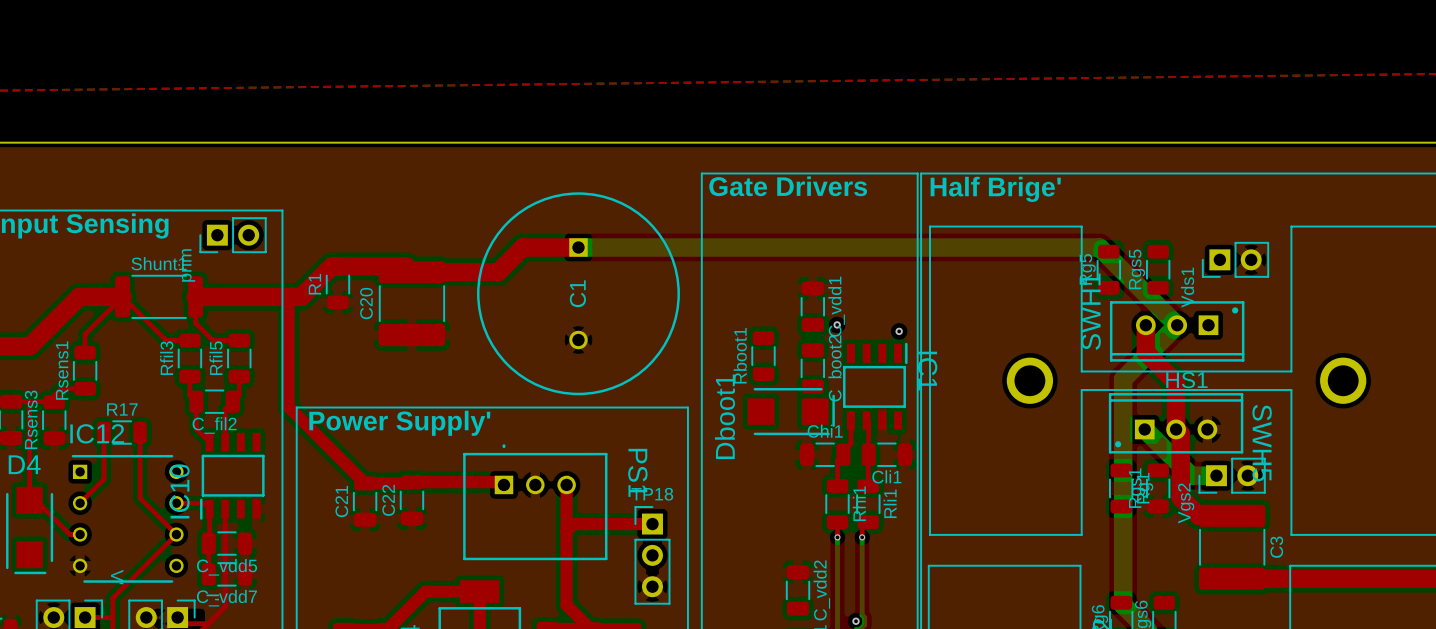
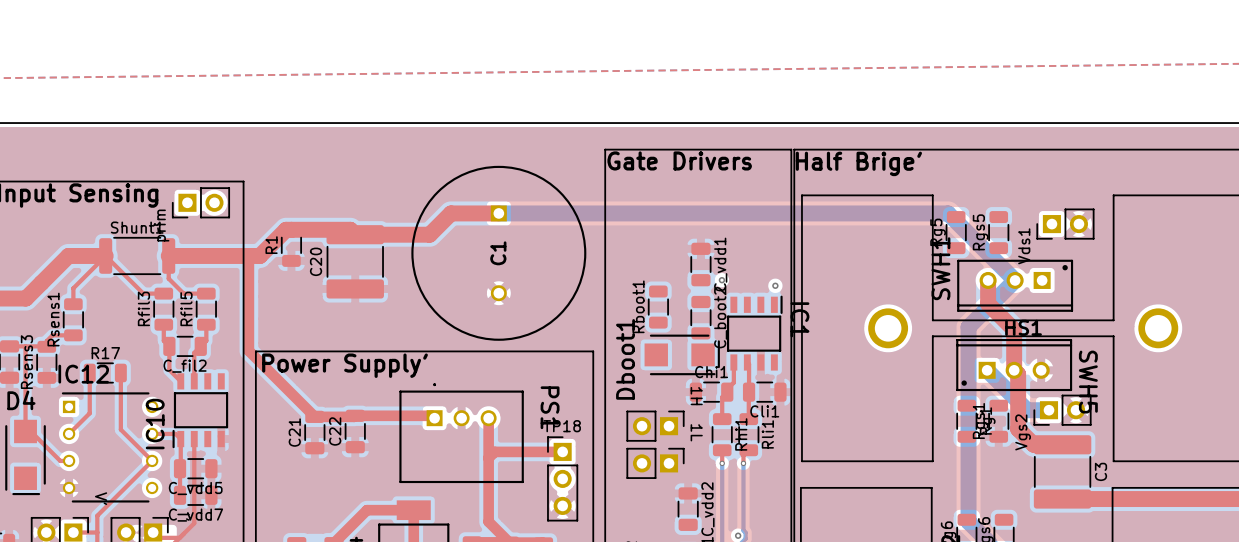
part: none -> 1H (655, 426)
part: none -> 1L (655, 463)

